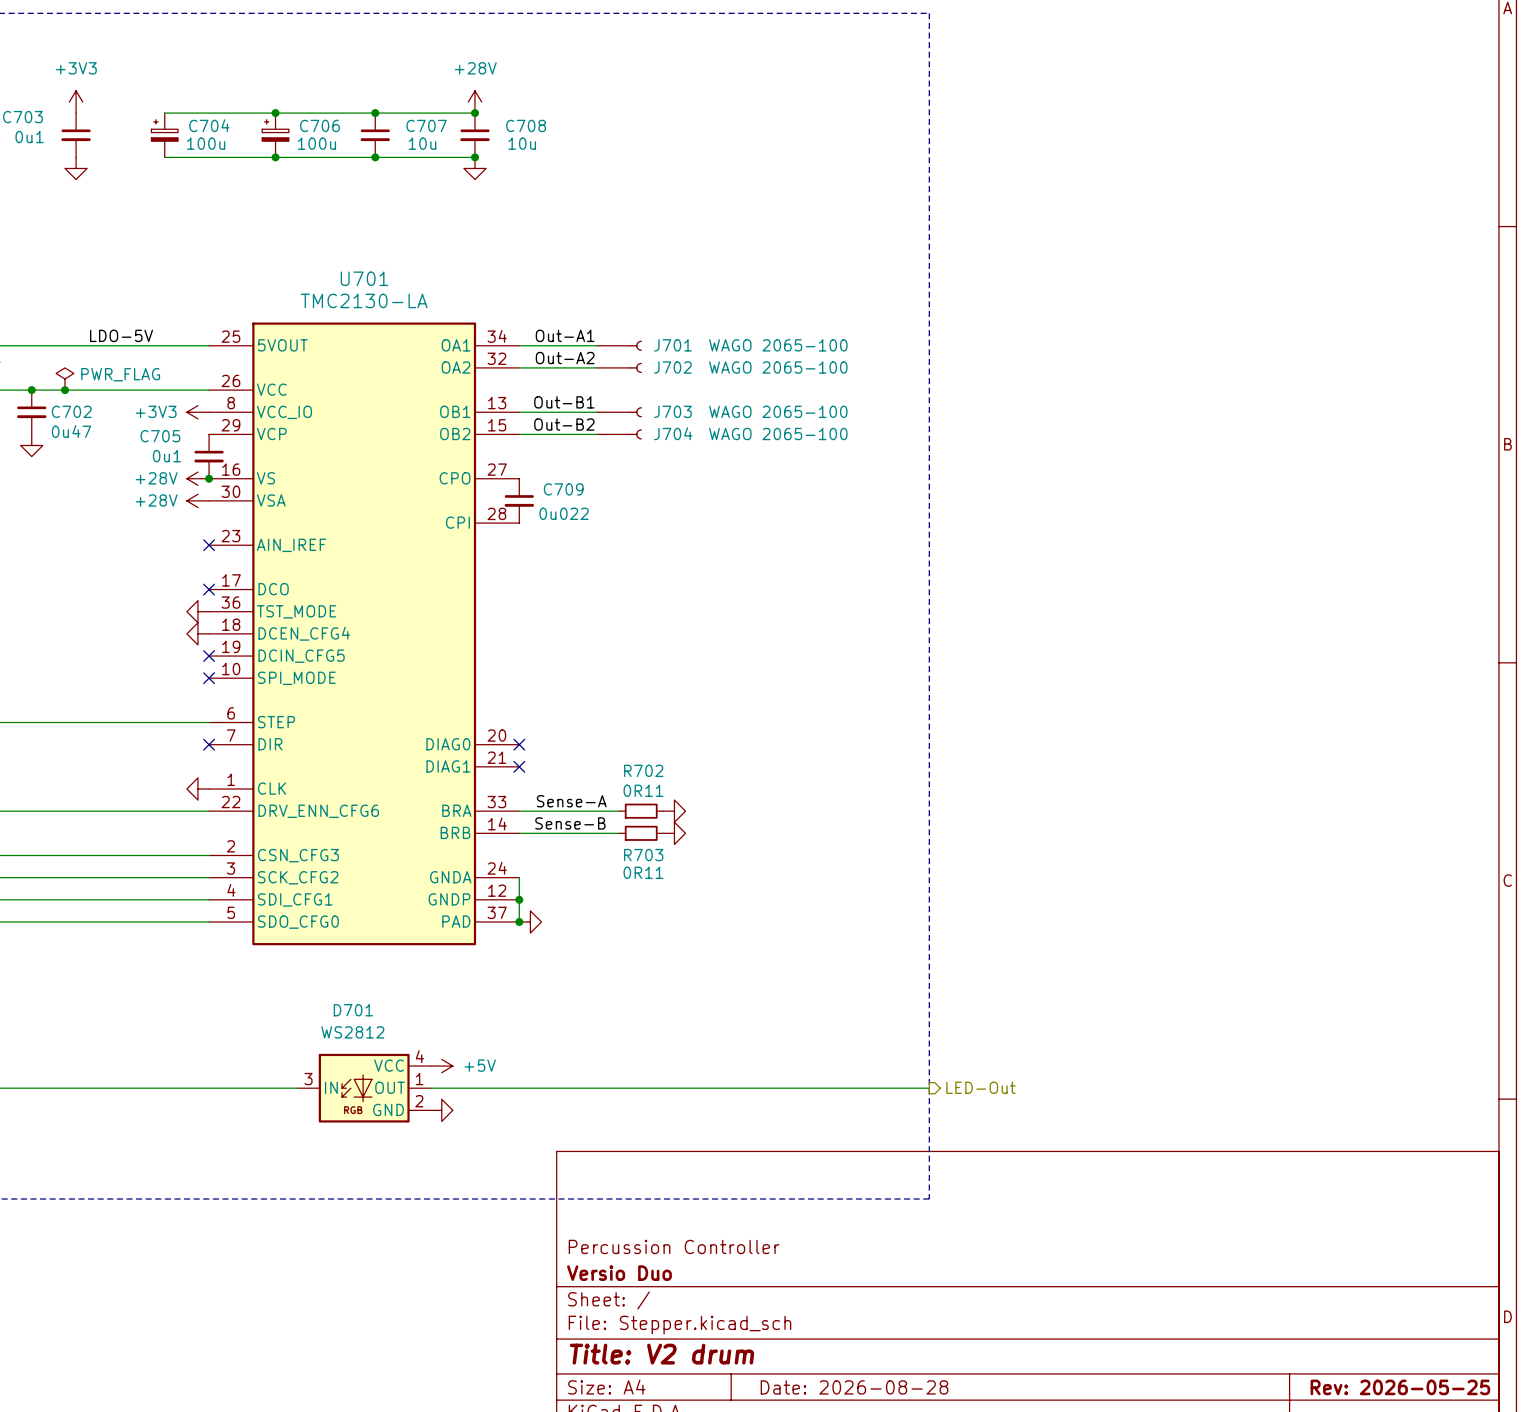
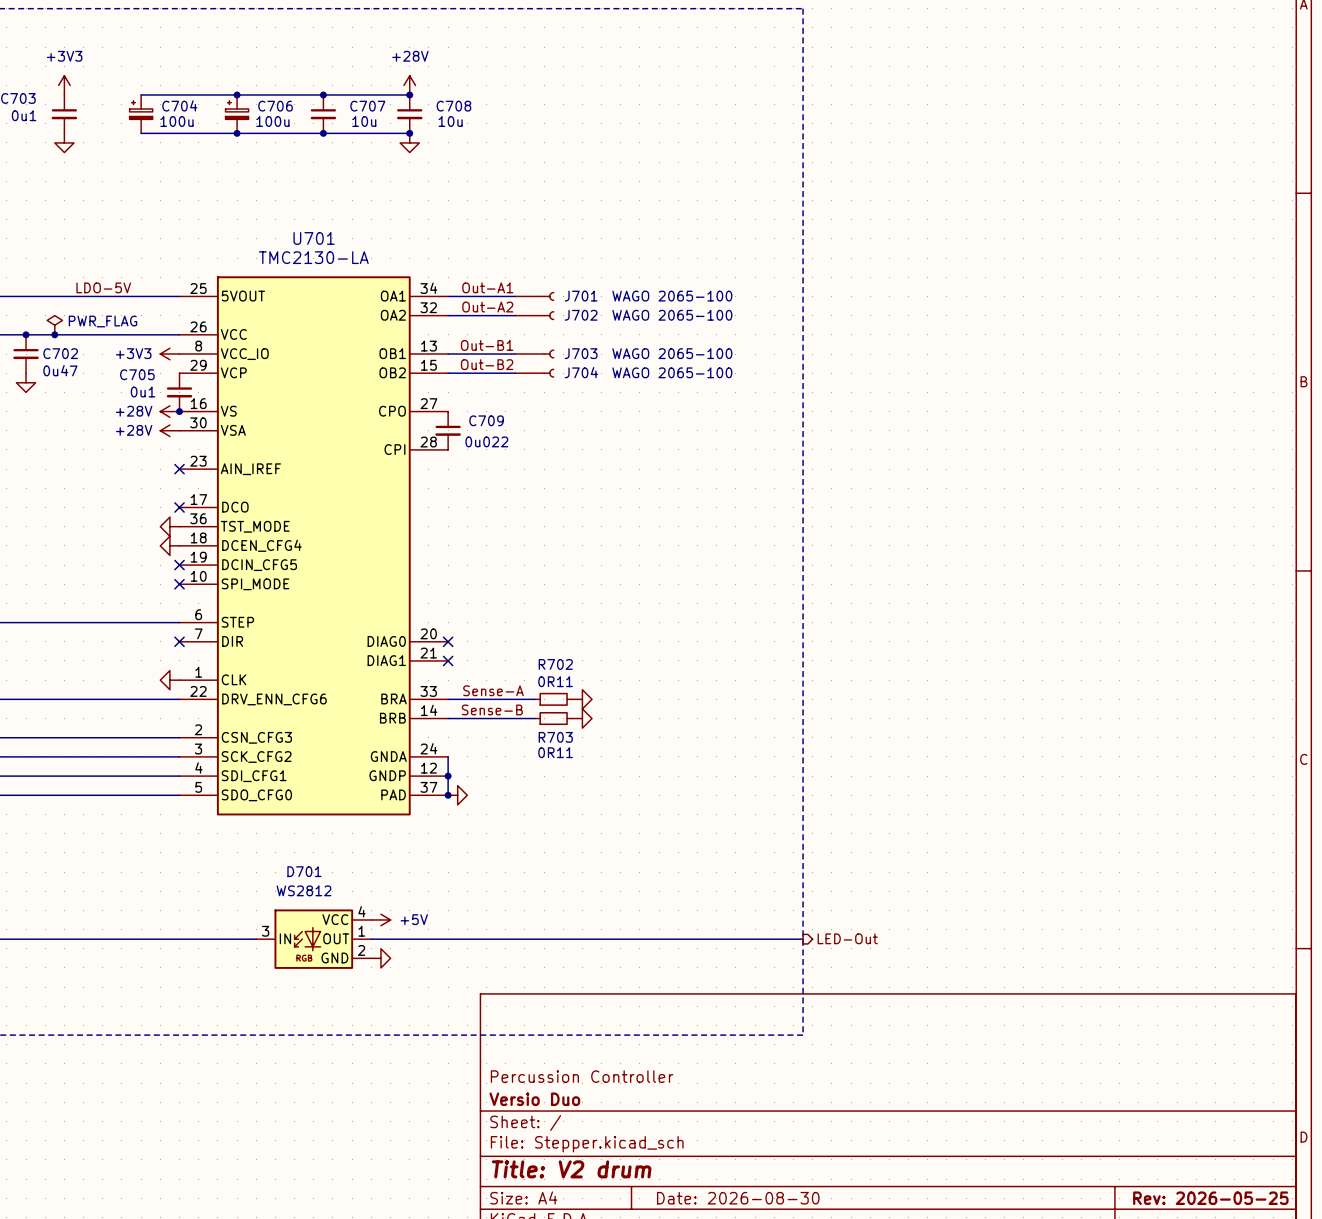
title block: Date: 2026-08-28 (854, 1387) -> Date: 2026-08-30 (738, 1198)

